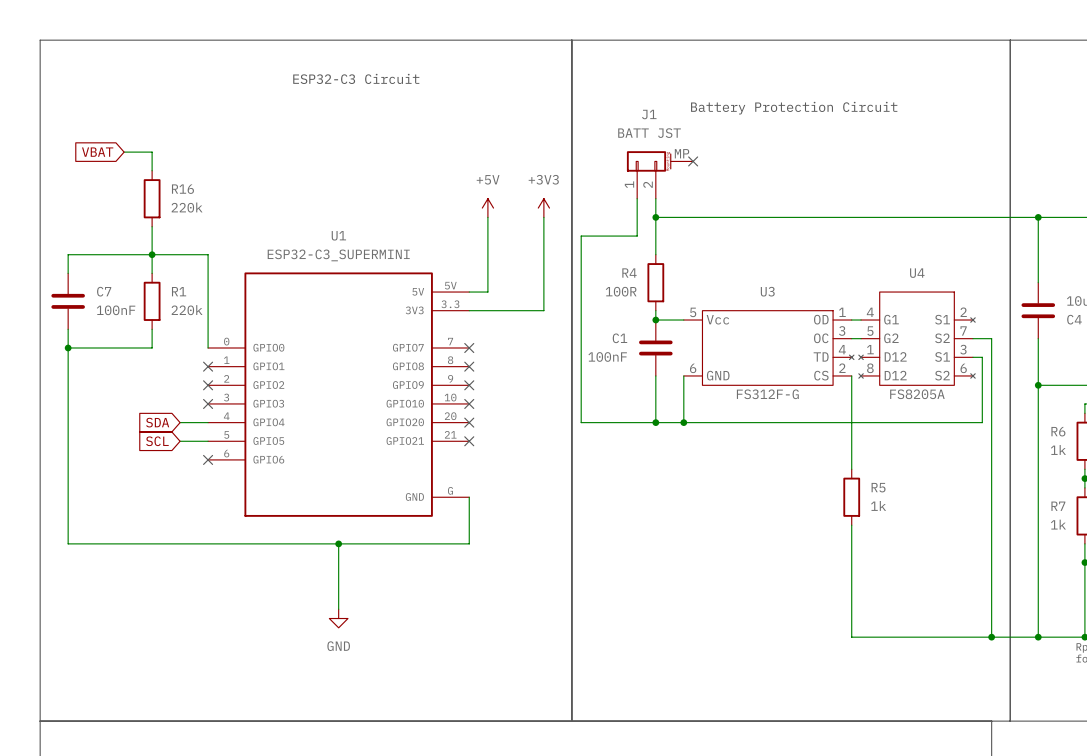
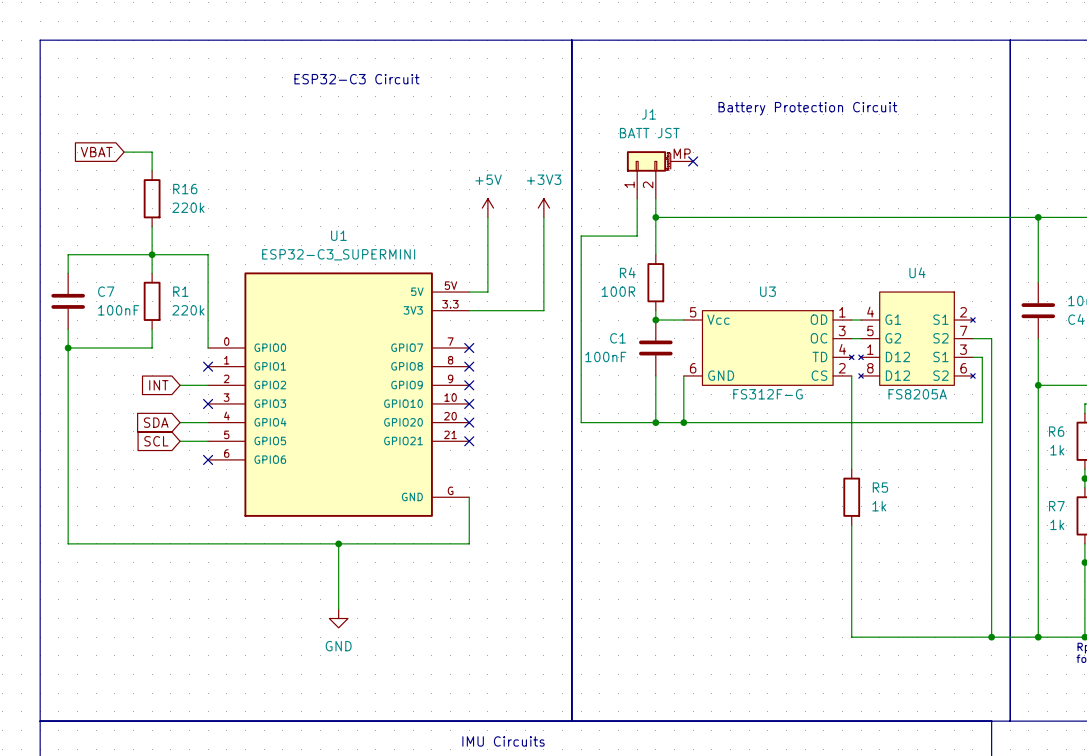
global label: none -> INT (158, 385)
wire: none -> (180, 385) (208, 385)
no-connect mark: (208, 385) -> none
text: none -> IMU Circuits (503, 741)

